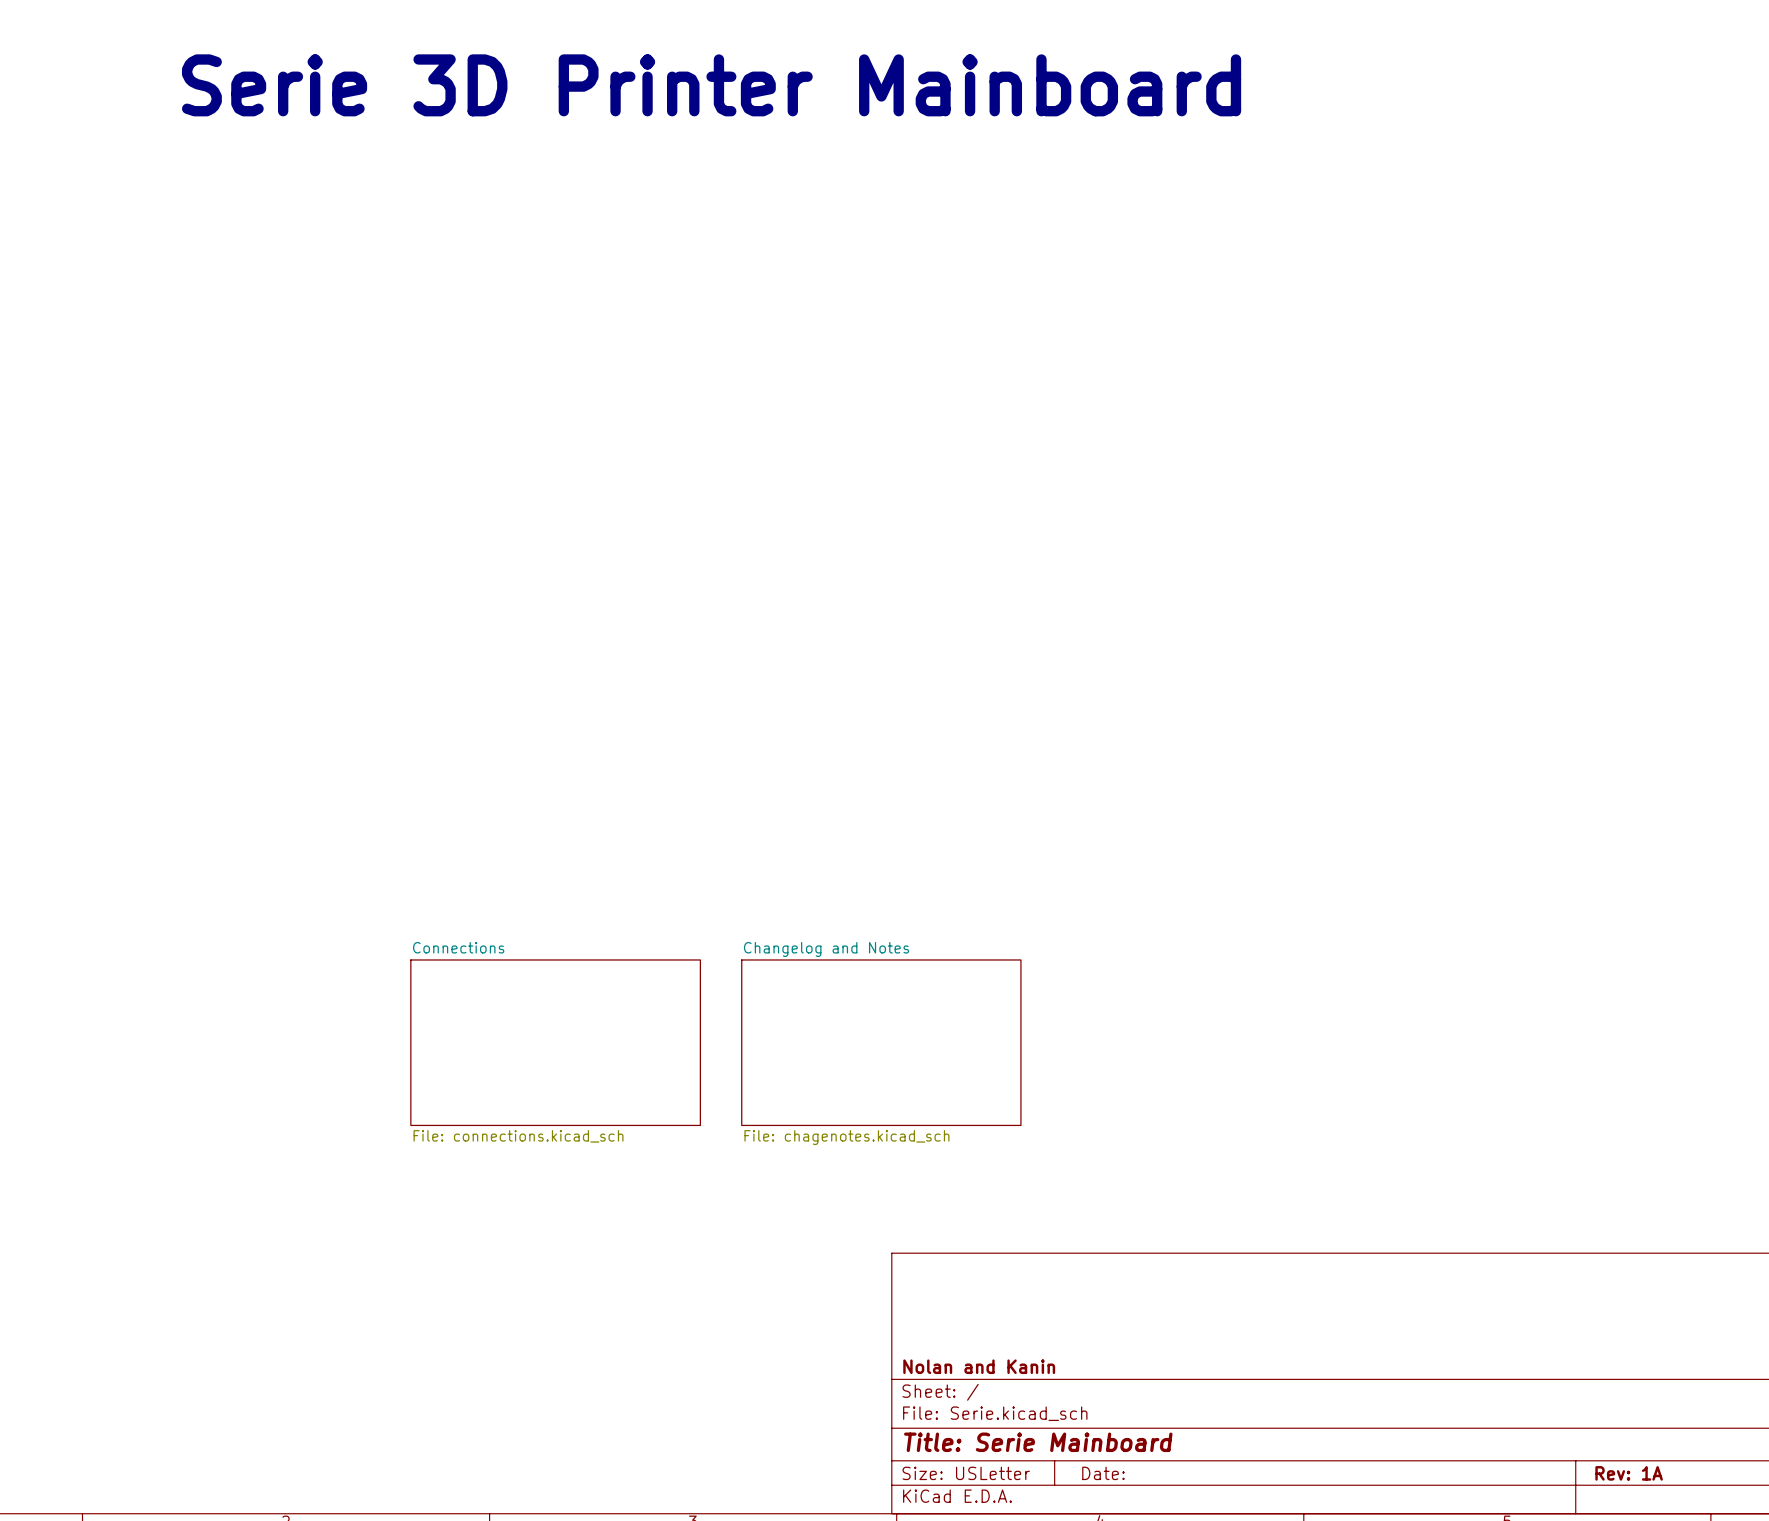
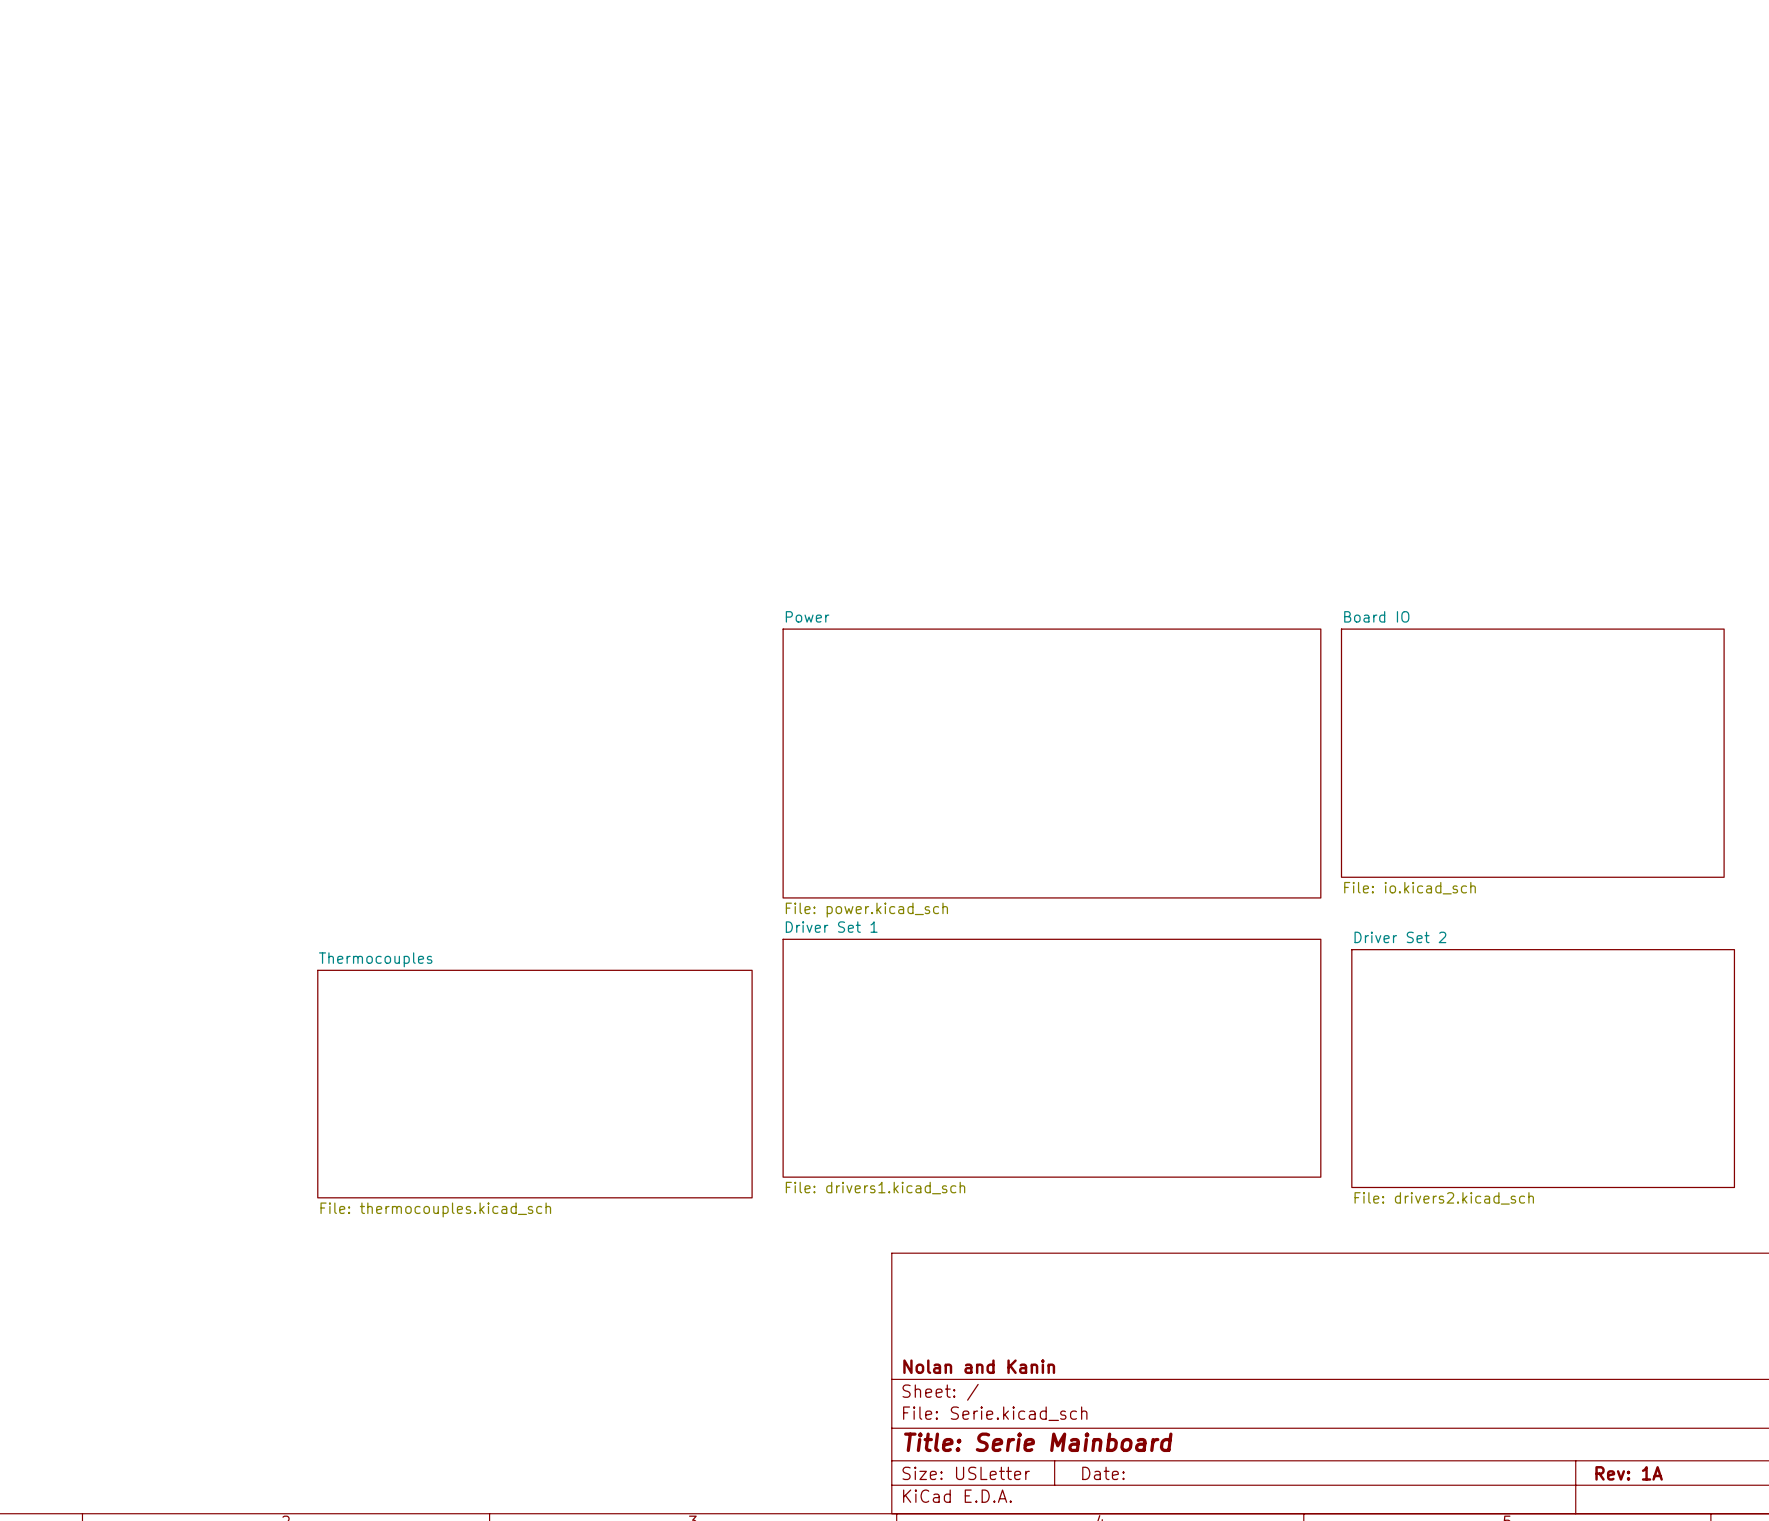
text: Serie 3D Printer Mainboard (711, 85) -> none
sheet Board IO: none -> File: io.kicad_sch (1532, 753)
sheet Power: none -> File: power.kicad_sch (1051, 763)
sheet Connections: File: connections.kicad_sch (555, 1042) -> none
sheet Changelog and Notes: File: chagenotes.kicad_sch (881, 1042) -> none
sheet Driver Set 1: none -> File: drivers1.kicad_sch (1051, 1058)
sheet Driver Set 2: none -> File: drivers2.kicad_sch (1543, 1068)
sheet Thermocouples: none -> File: thermocouples.kicad_sch (534, 1084)

